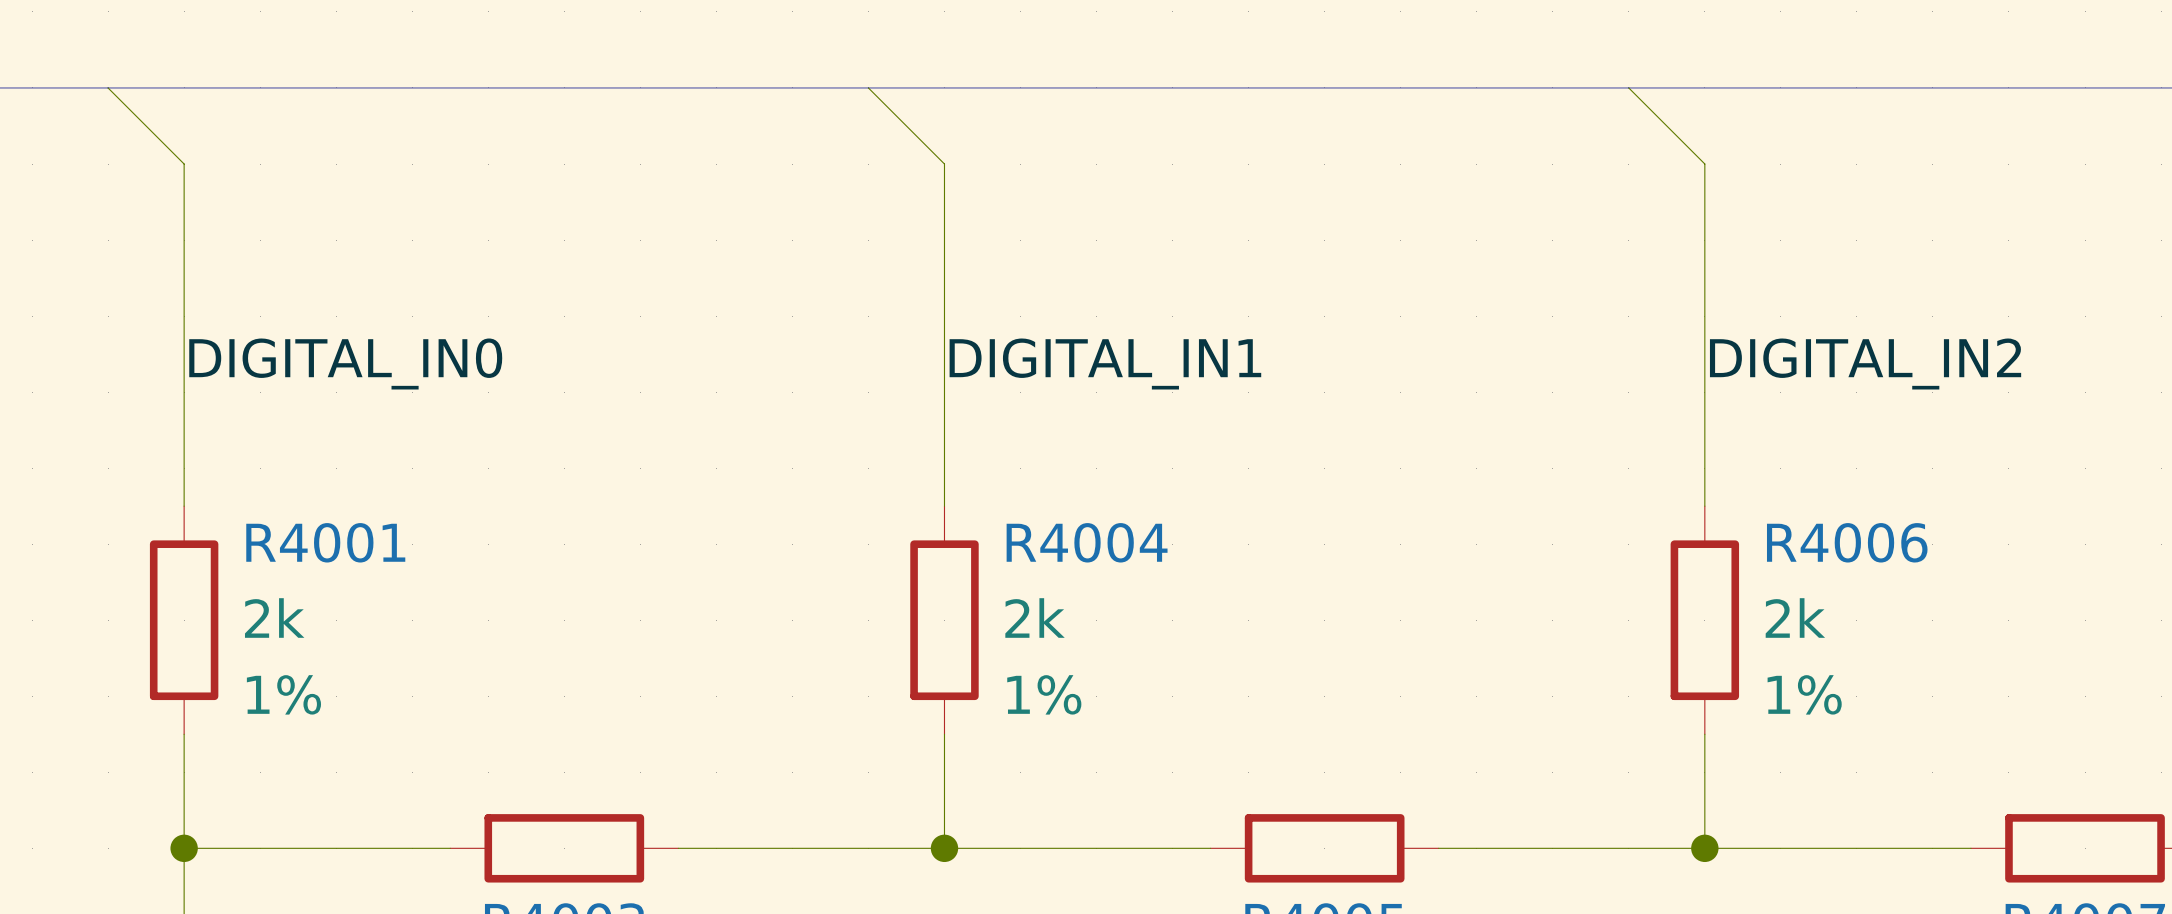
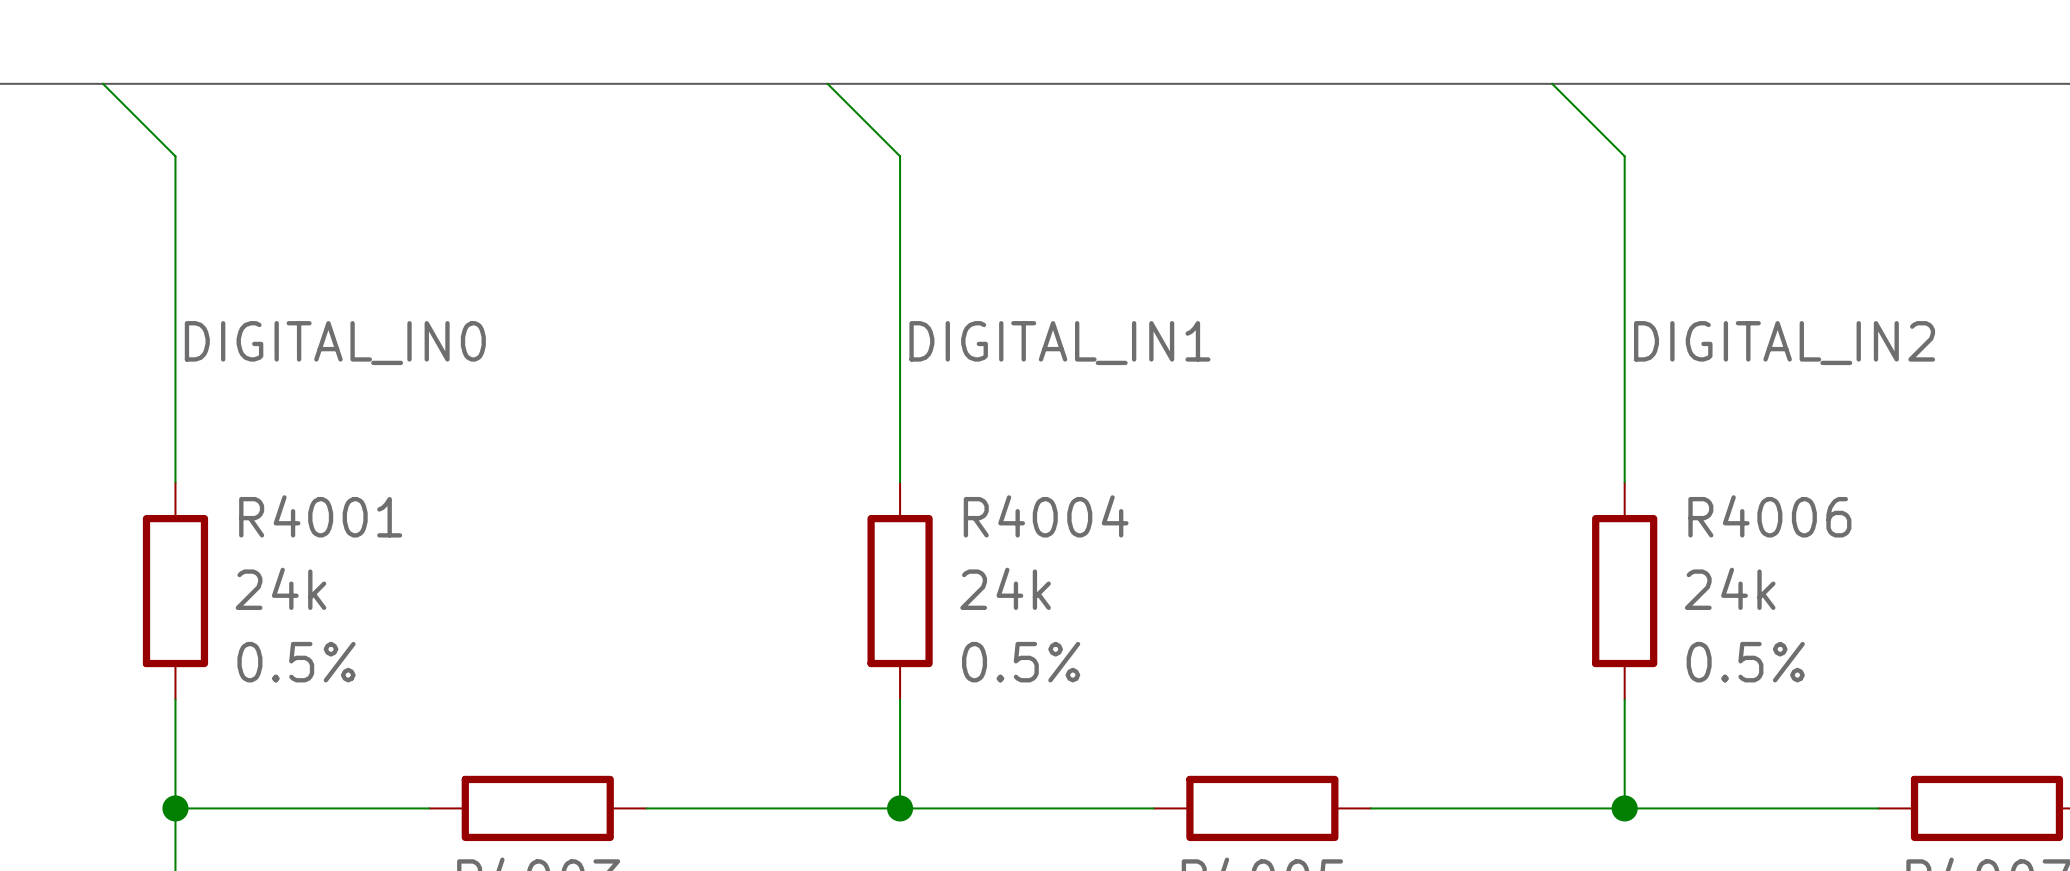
R4001 value: 2k (274, 618) -> 24k (280, 588)
R4004 value: 2k (1035, 618) -> 24k (1005, 588)
R4006 value: 2k (1795, 618) -> 24k (1730, 588)
R4001 text: 1% (283, 694) -> 0.5% (296, 662)
R4004 text: 1% (1044, 694) -> 0.5% (1021, 662)
R4006 text: 1% (1804, 694) -> 0.5% (1745, 662)

